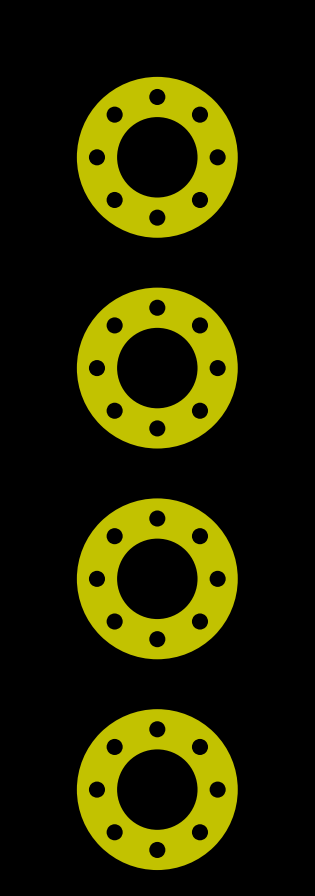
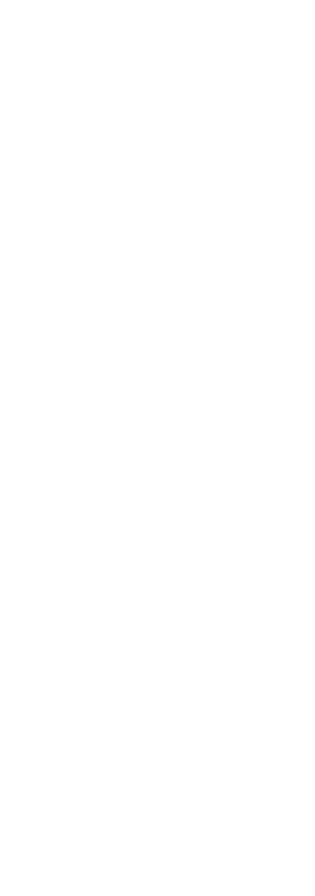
part: (157, 157) -> none
part: (157, 368) -> none
part: (157, 578) -> none
part: (157, 789) -> none

